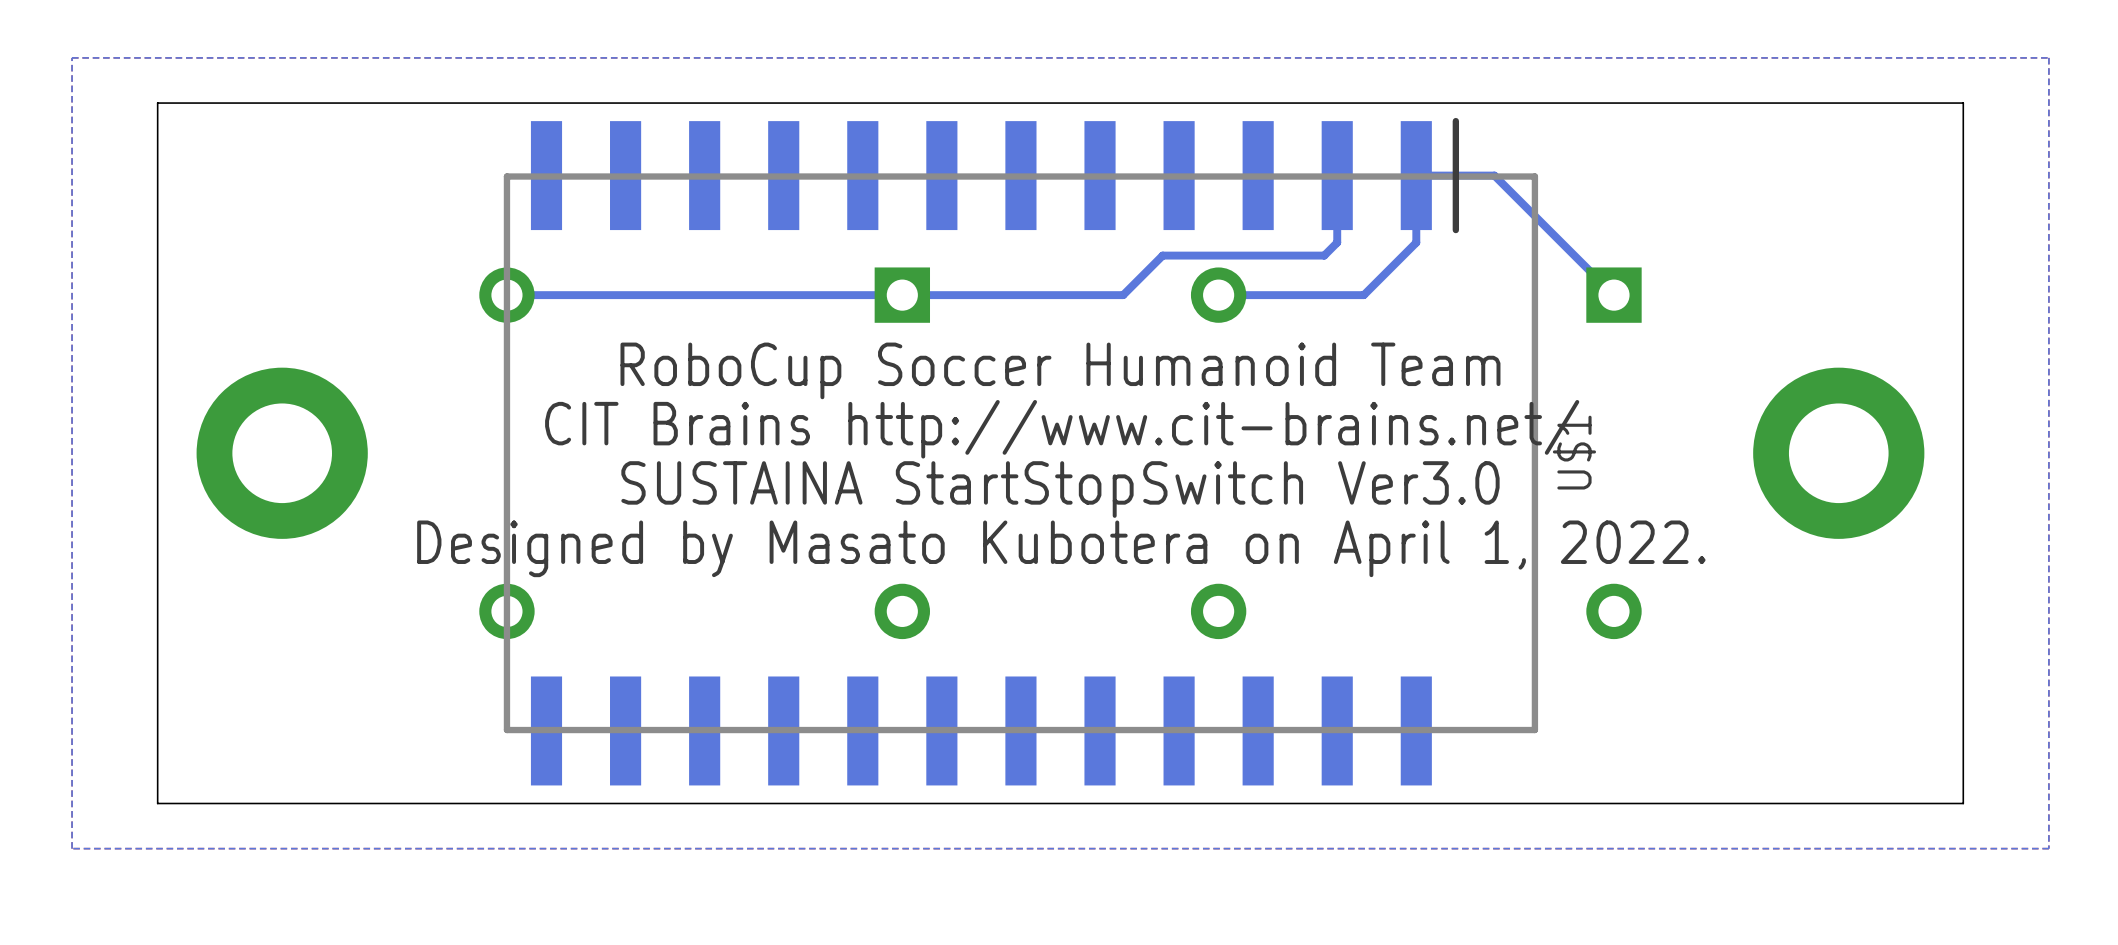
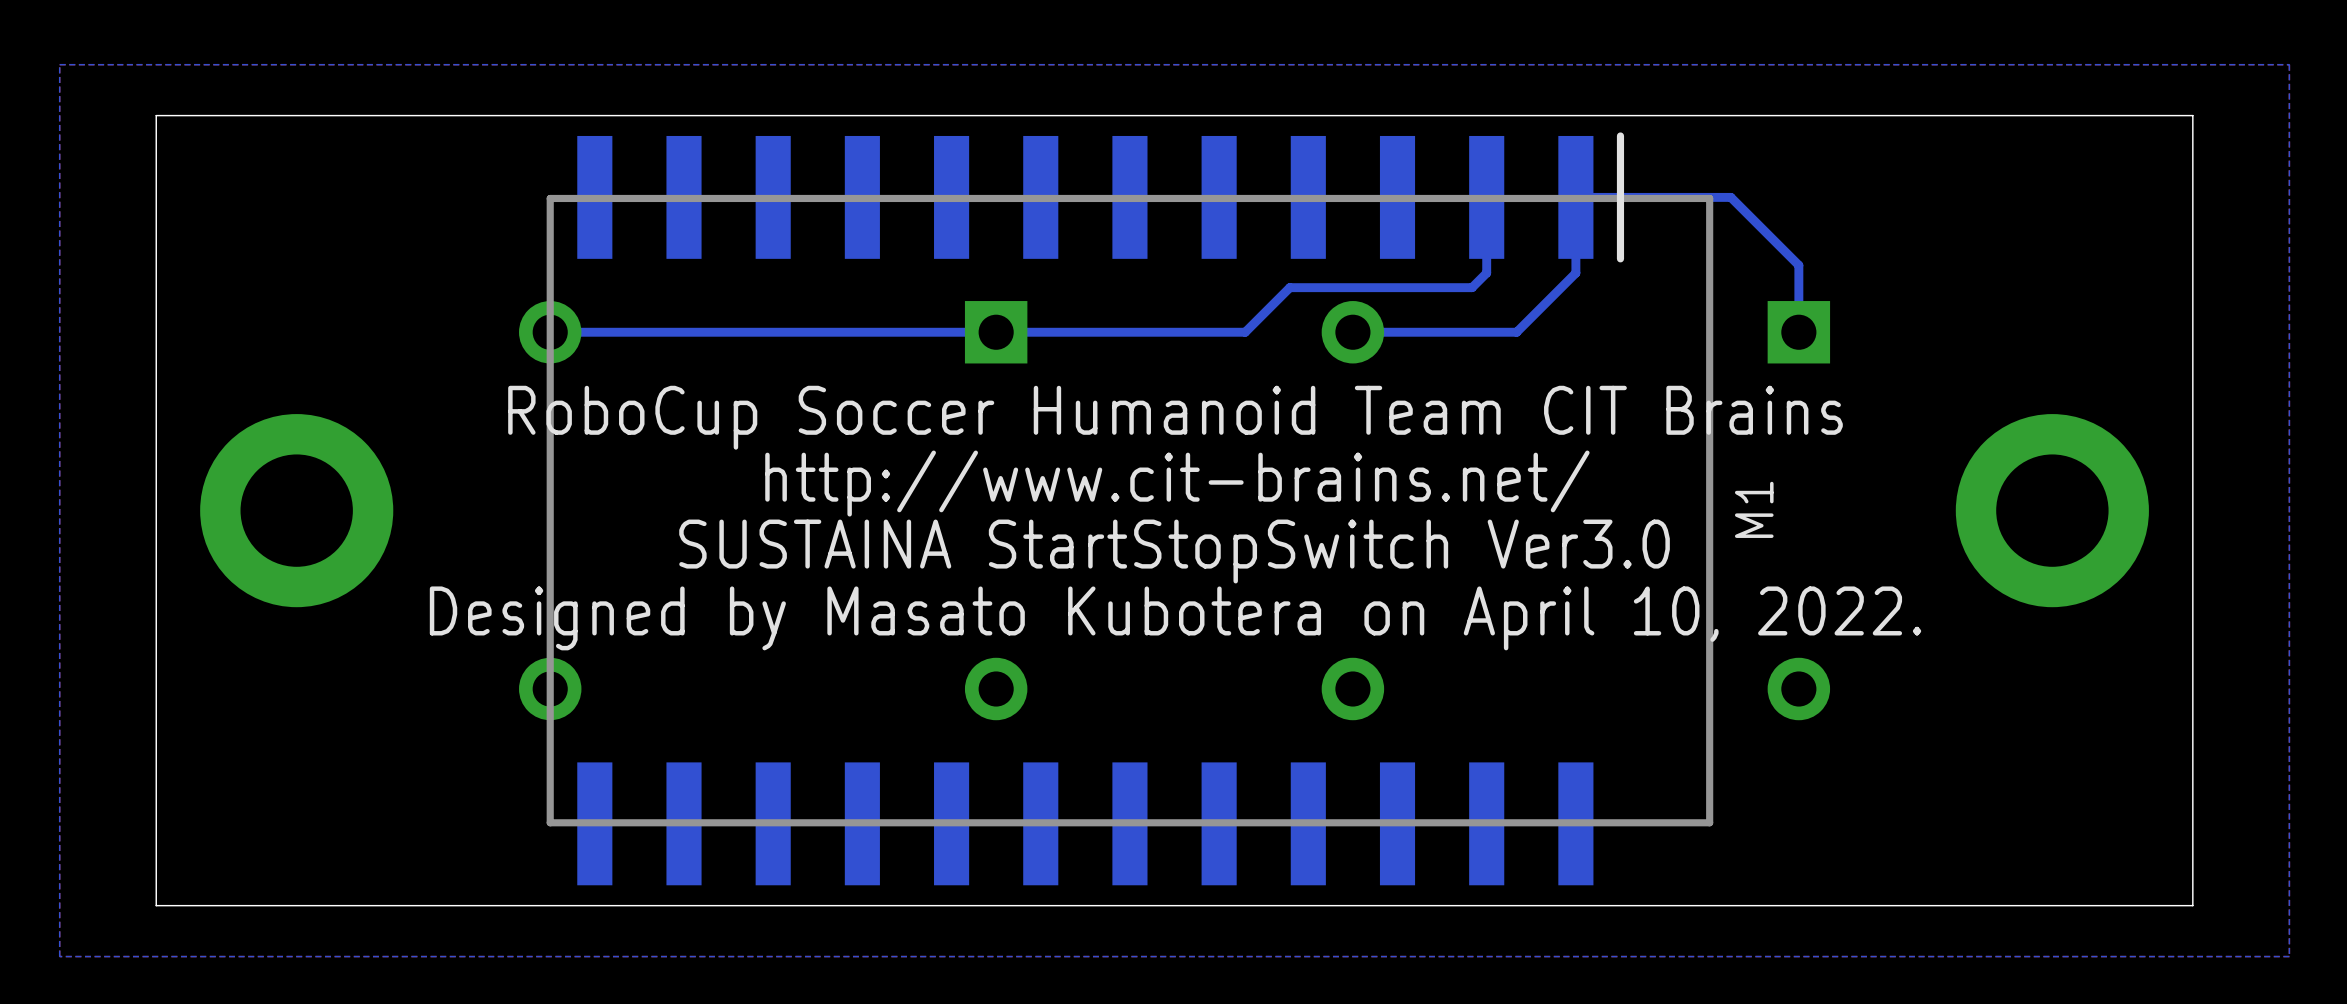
bottom track: (1494, 175) (1613, 295) -> (1664, 197) (1730, 197) (1798, 265) (1798, 332)
text: RoboCup Soccer Humanoid Team (1060, 370) -> RoboCup Soccer Humanoid Team CIT Brains (1175, 417)
text: CIT Brains http://www.cit-brains.net/ (1062, 429) -> http://www.cit-brains.net/ (1177, 483)
U$1 name: U$1 (1574, 452) -> M1 (1754, 509)
text: Designed by Masato Kubotera on April 1, 2022. (1061, 548) -> Designed by Masato Kubotera on April 10, 2022. (1175, 618)

